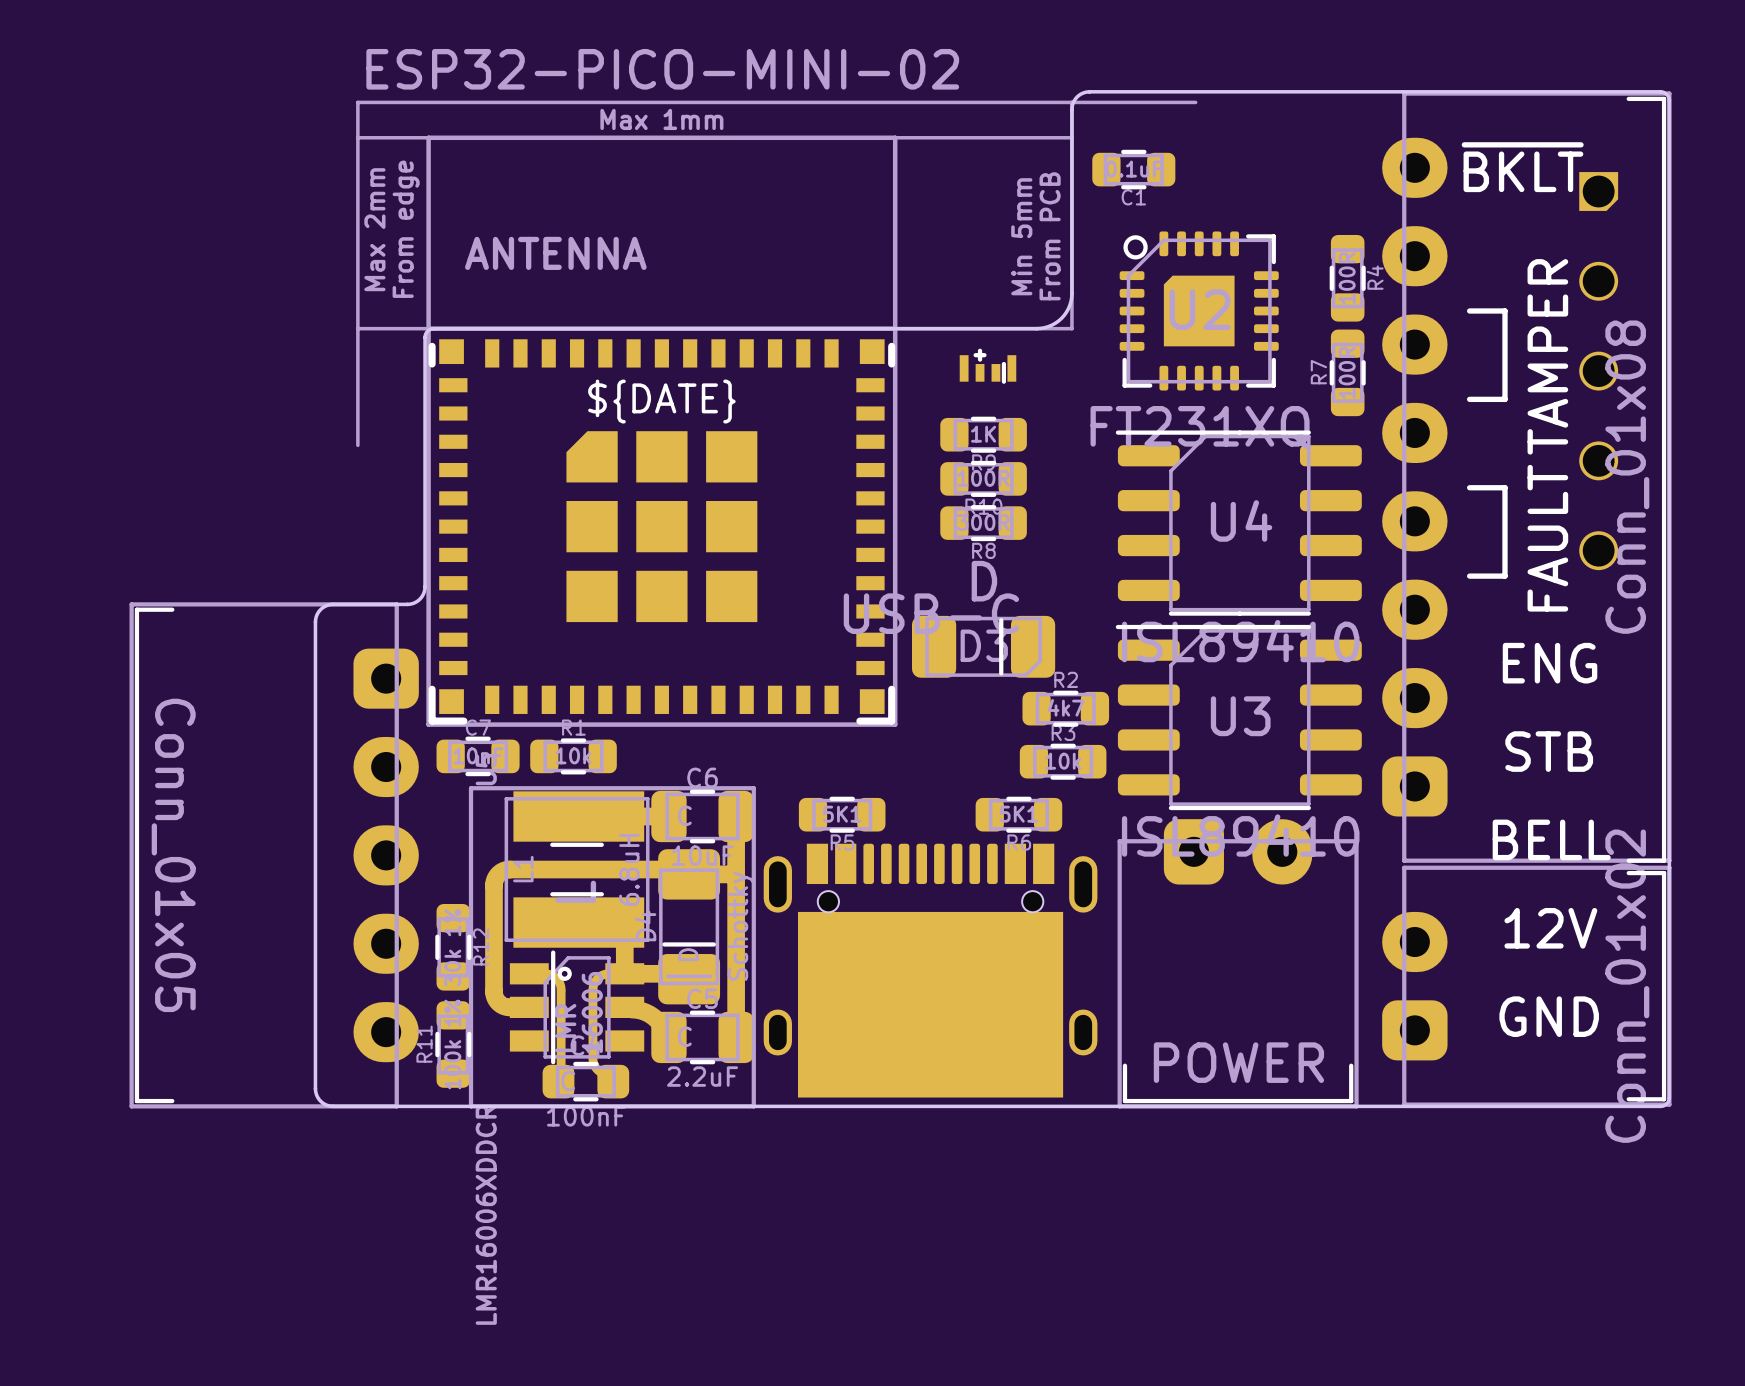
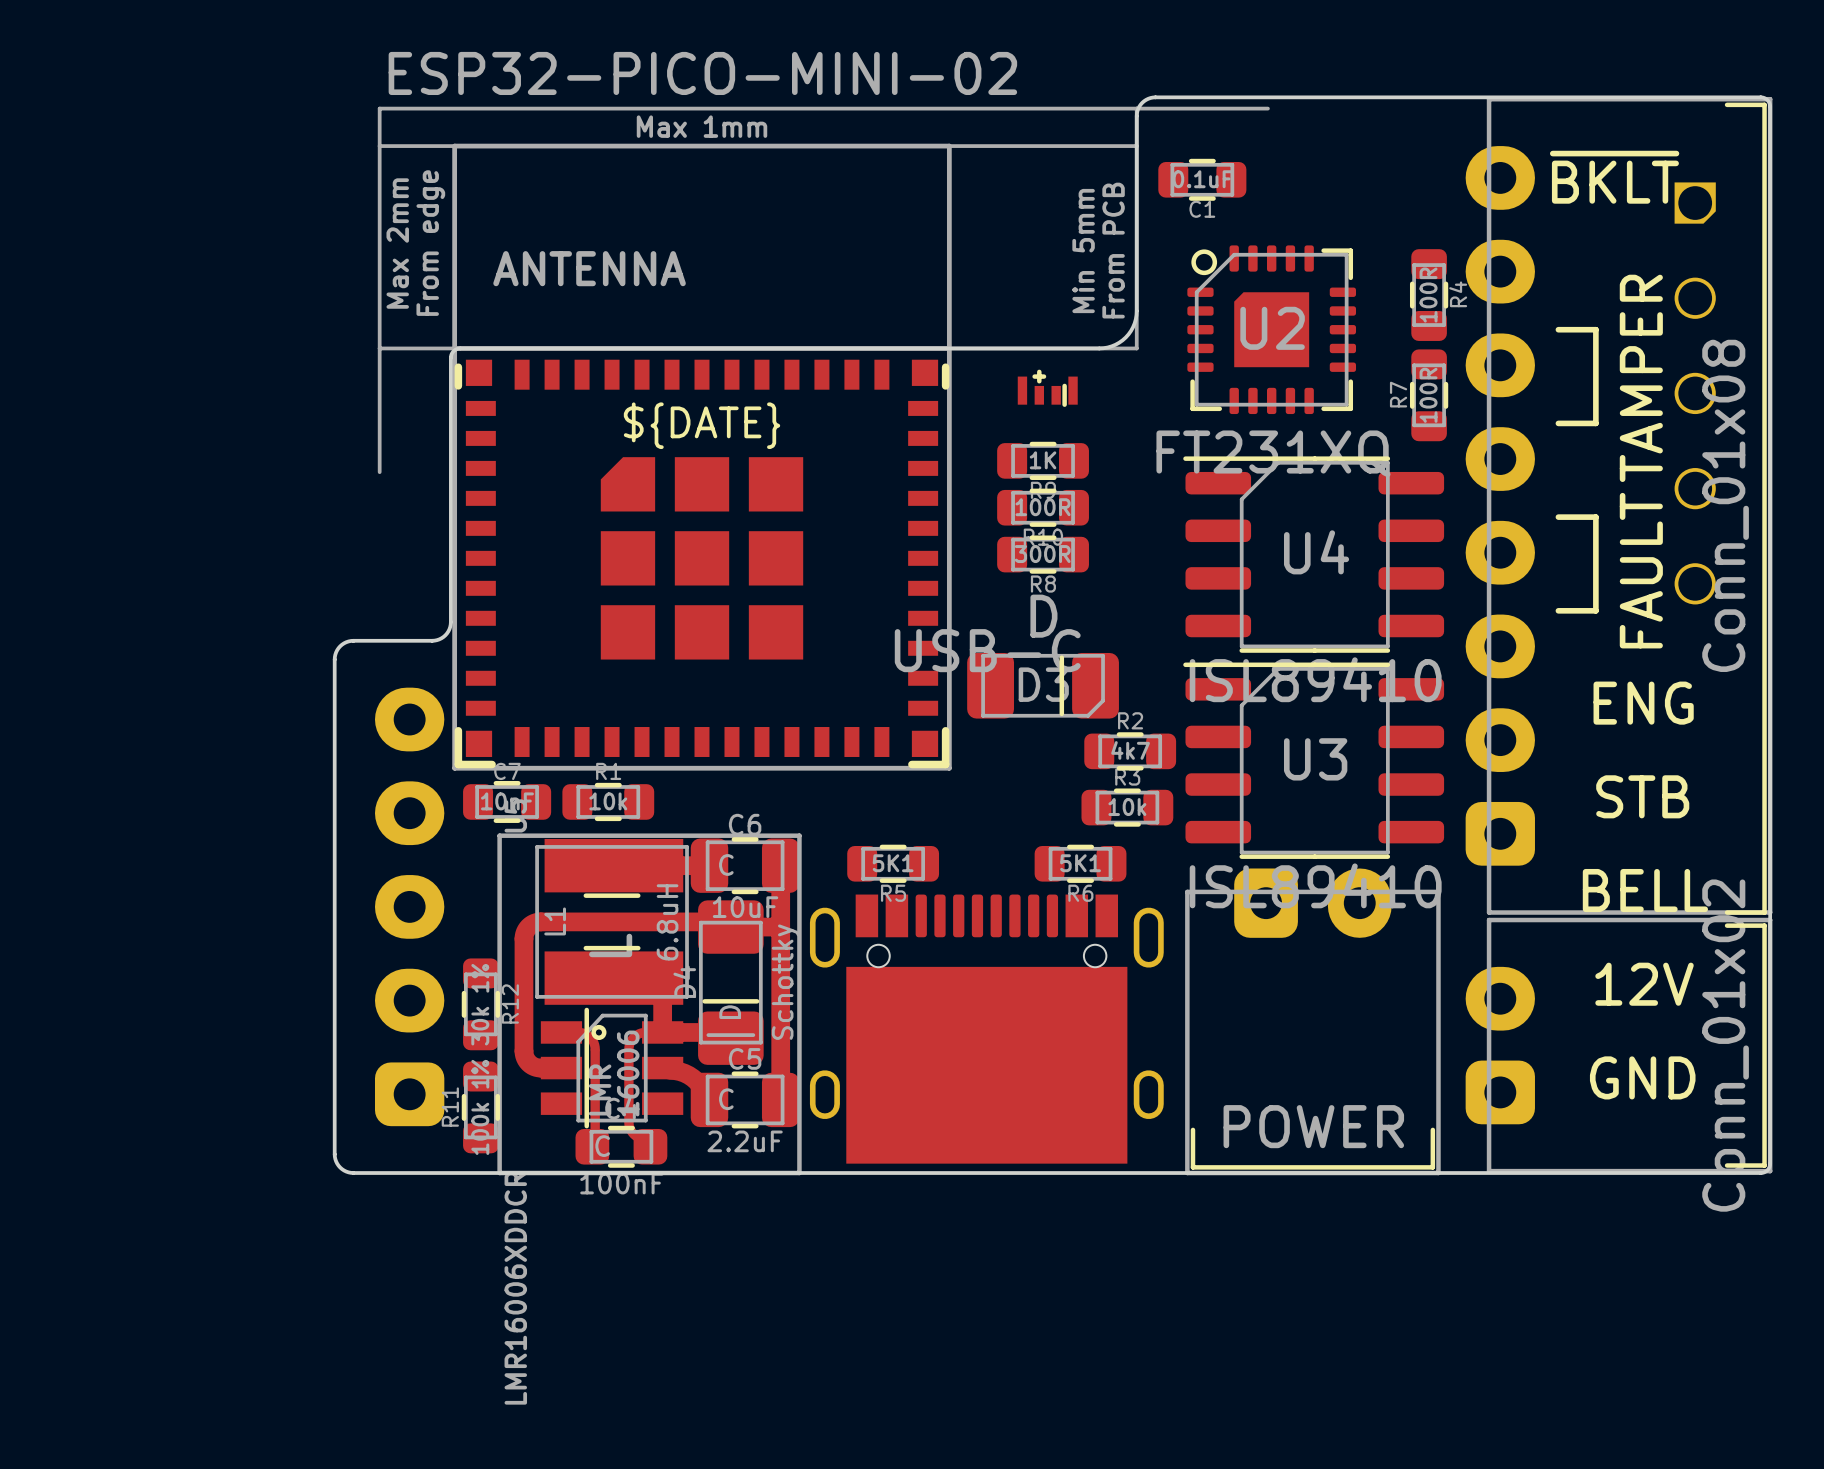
part side: top (274, 855) -> bottom (409, 906)

